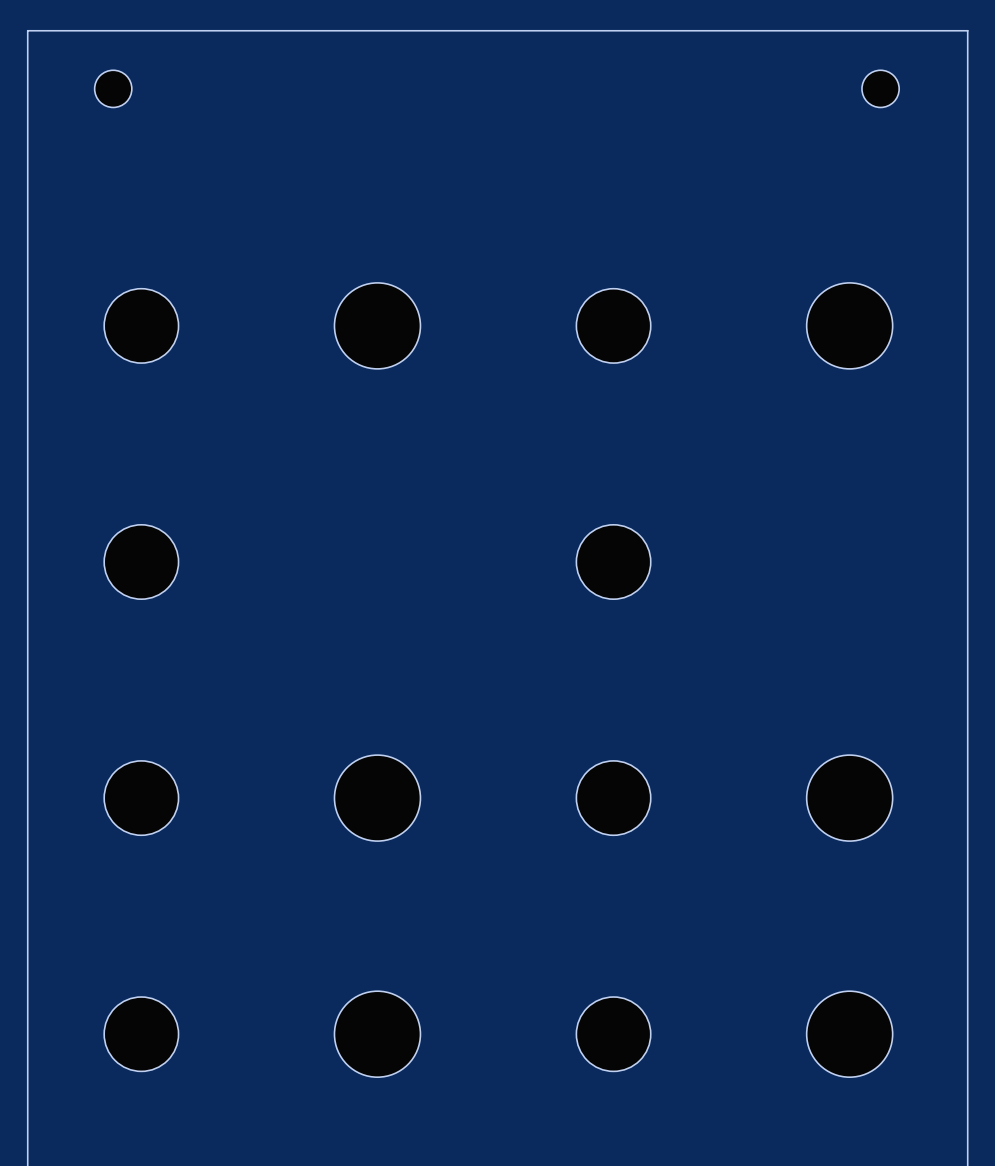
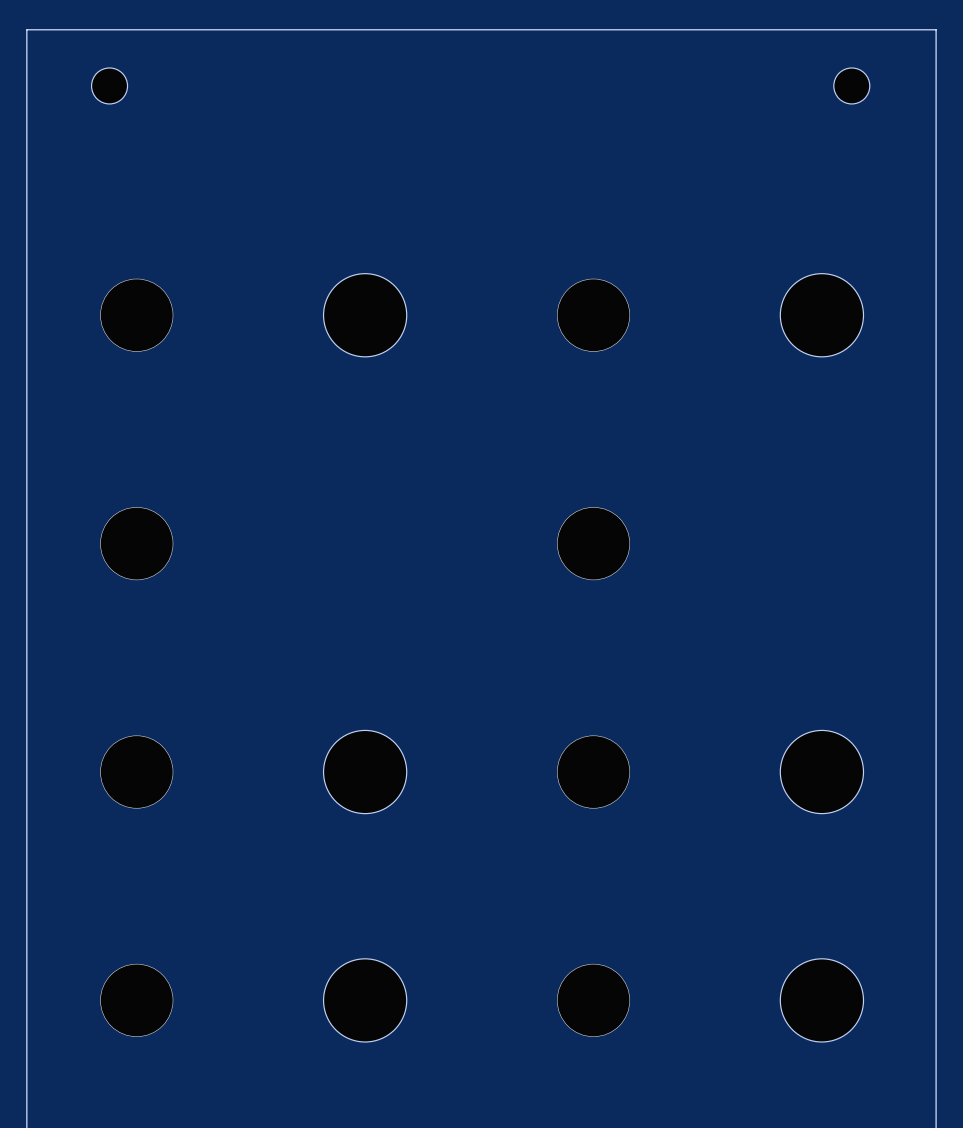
part footprint: [104, 288, 179, 364] -> [100, 278, 174, 352]
part footprint: [576, 288, 651, 364] -> [556, 278, 631, 352]
part footprint: [104, 524, 179, 600] -> [100, 507, 174, 581]
part footprint: [576, 524, 651, 600] -> [556, 507, 631, 581]
part footprint: [104, 760, 179, 836] -> [100, 735, 174, 809]
part footprint: [576, 760, 651, 836] -> [556, 735, 631, 809]
part footprint: [104, 997, 179, 1072] -> [100, 963, 174, 1037]
part footprint: [576, 997, 651, 1072] -> [556, 963, 631, 1037]

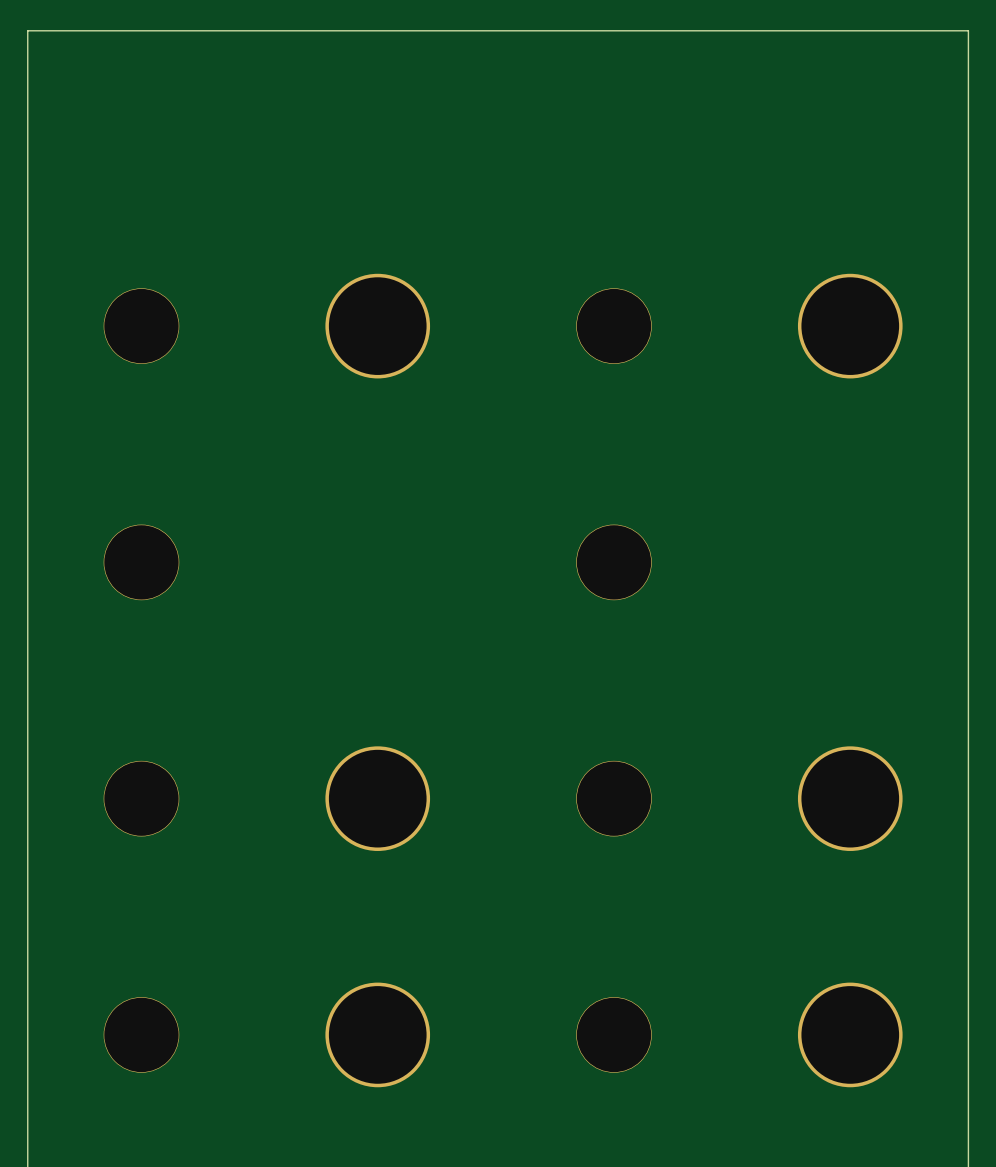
part: (109, 85) -> none
part: (851, 85) -> none
part footprint: [323, 273, 407, 357] -> [325, 273, 431, 379]
part footprint: [780, 273, 864, 357] -> [797, 273, 903, 379]
part footprint: [323, 730, 407, 814] -> [325, 746, 431, 851]
part footprint: [780, 730, 864, 814] -> [797, 746, 903, 851]
part footprint: [323, 958, 407, 1042] -> [325, 982, 431, 1088]
part footprint: [780, 958, 864, 1042] -> [797, 982, 903, 1088]

